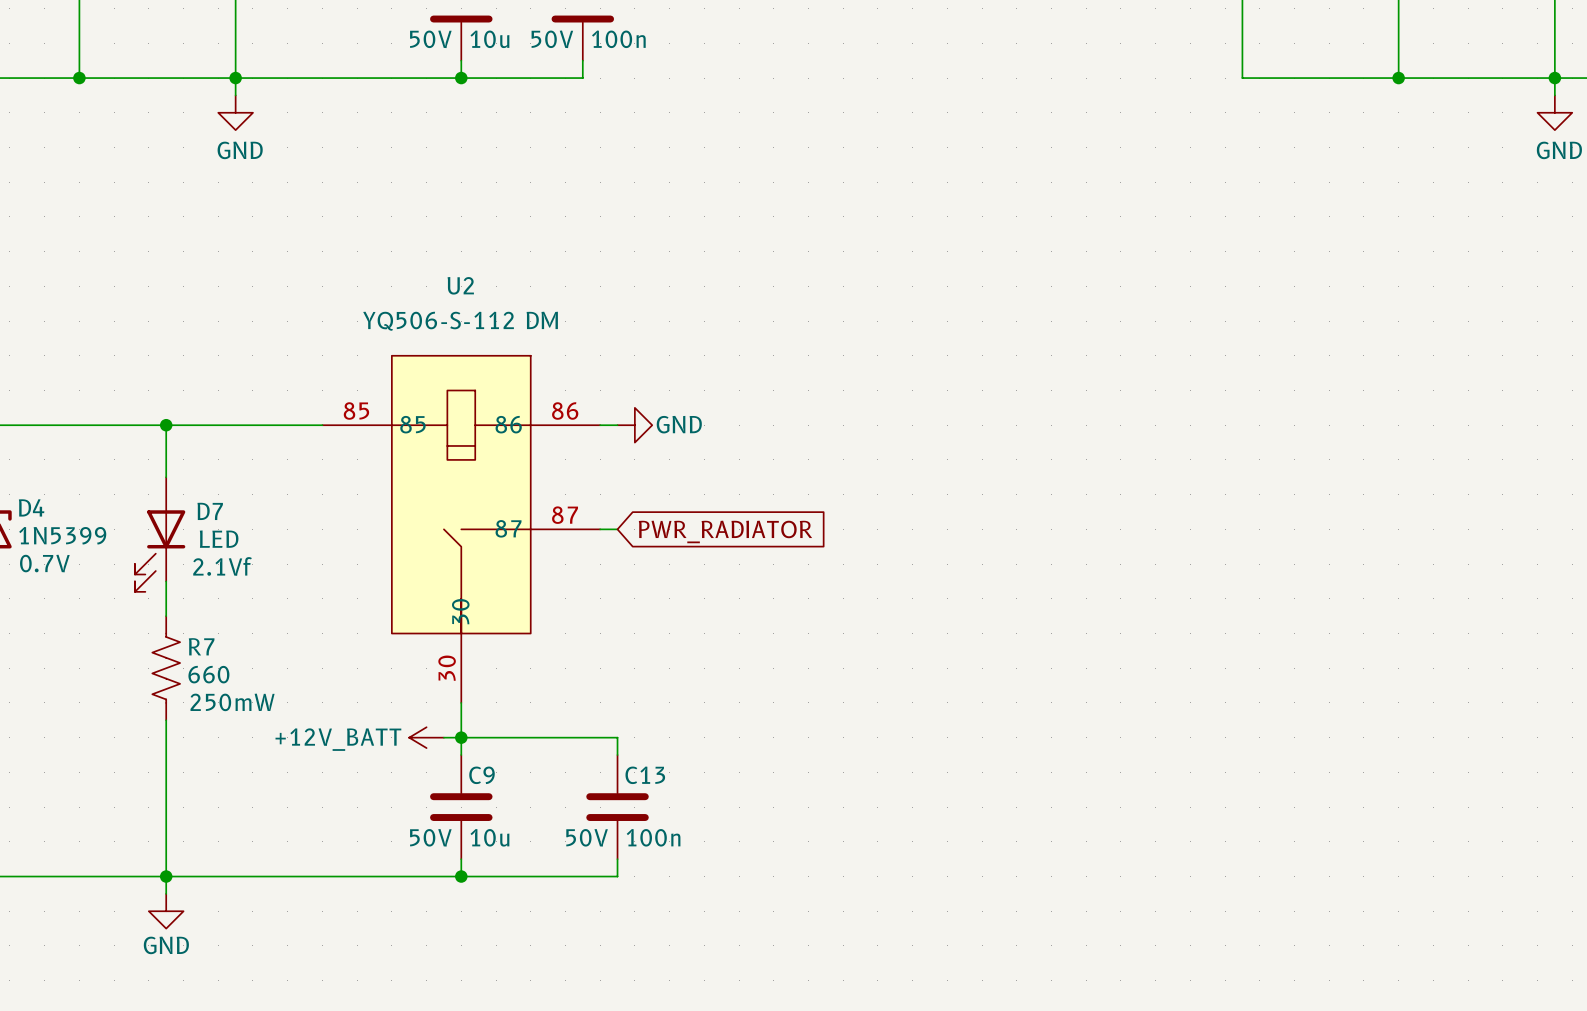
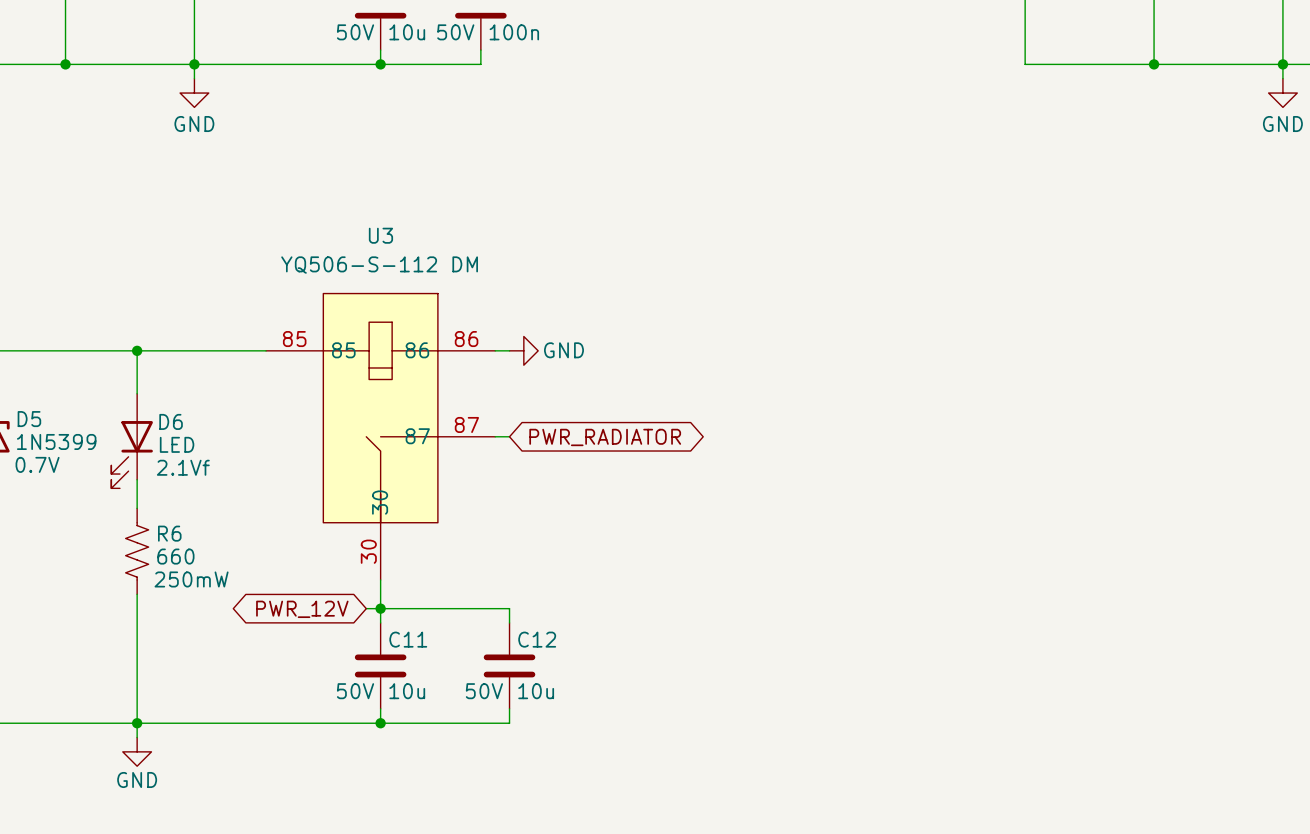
U2 name: U2 (460, 285) -> U3 (380, 235)
D4 name: D4 (31, 507) -> D5 (29, 419)
D7 name: D7 (210, 511) -> D6 (171, 421)
global label shape: input (725, 531) -> bidirectional (605, 437)
R7 name: R7 (201, 646) -> R6 (169, 533)
power symbol: +12V_BATT (426, 737) -> none
global label: none -> PWR_12V (302, 609)
C9 name: C9 (482, 775) -> C11 (408, 639)
C13 name: C13 (645, 775) -> C12 (537, 639)
C13 value: 100n (653, 837) -> 10u (536, 691)

